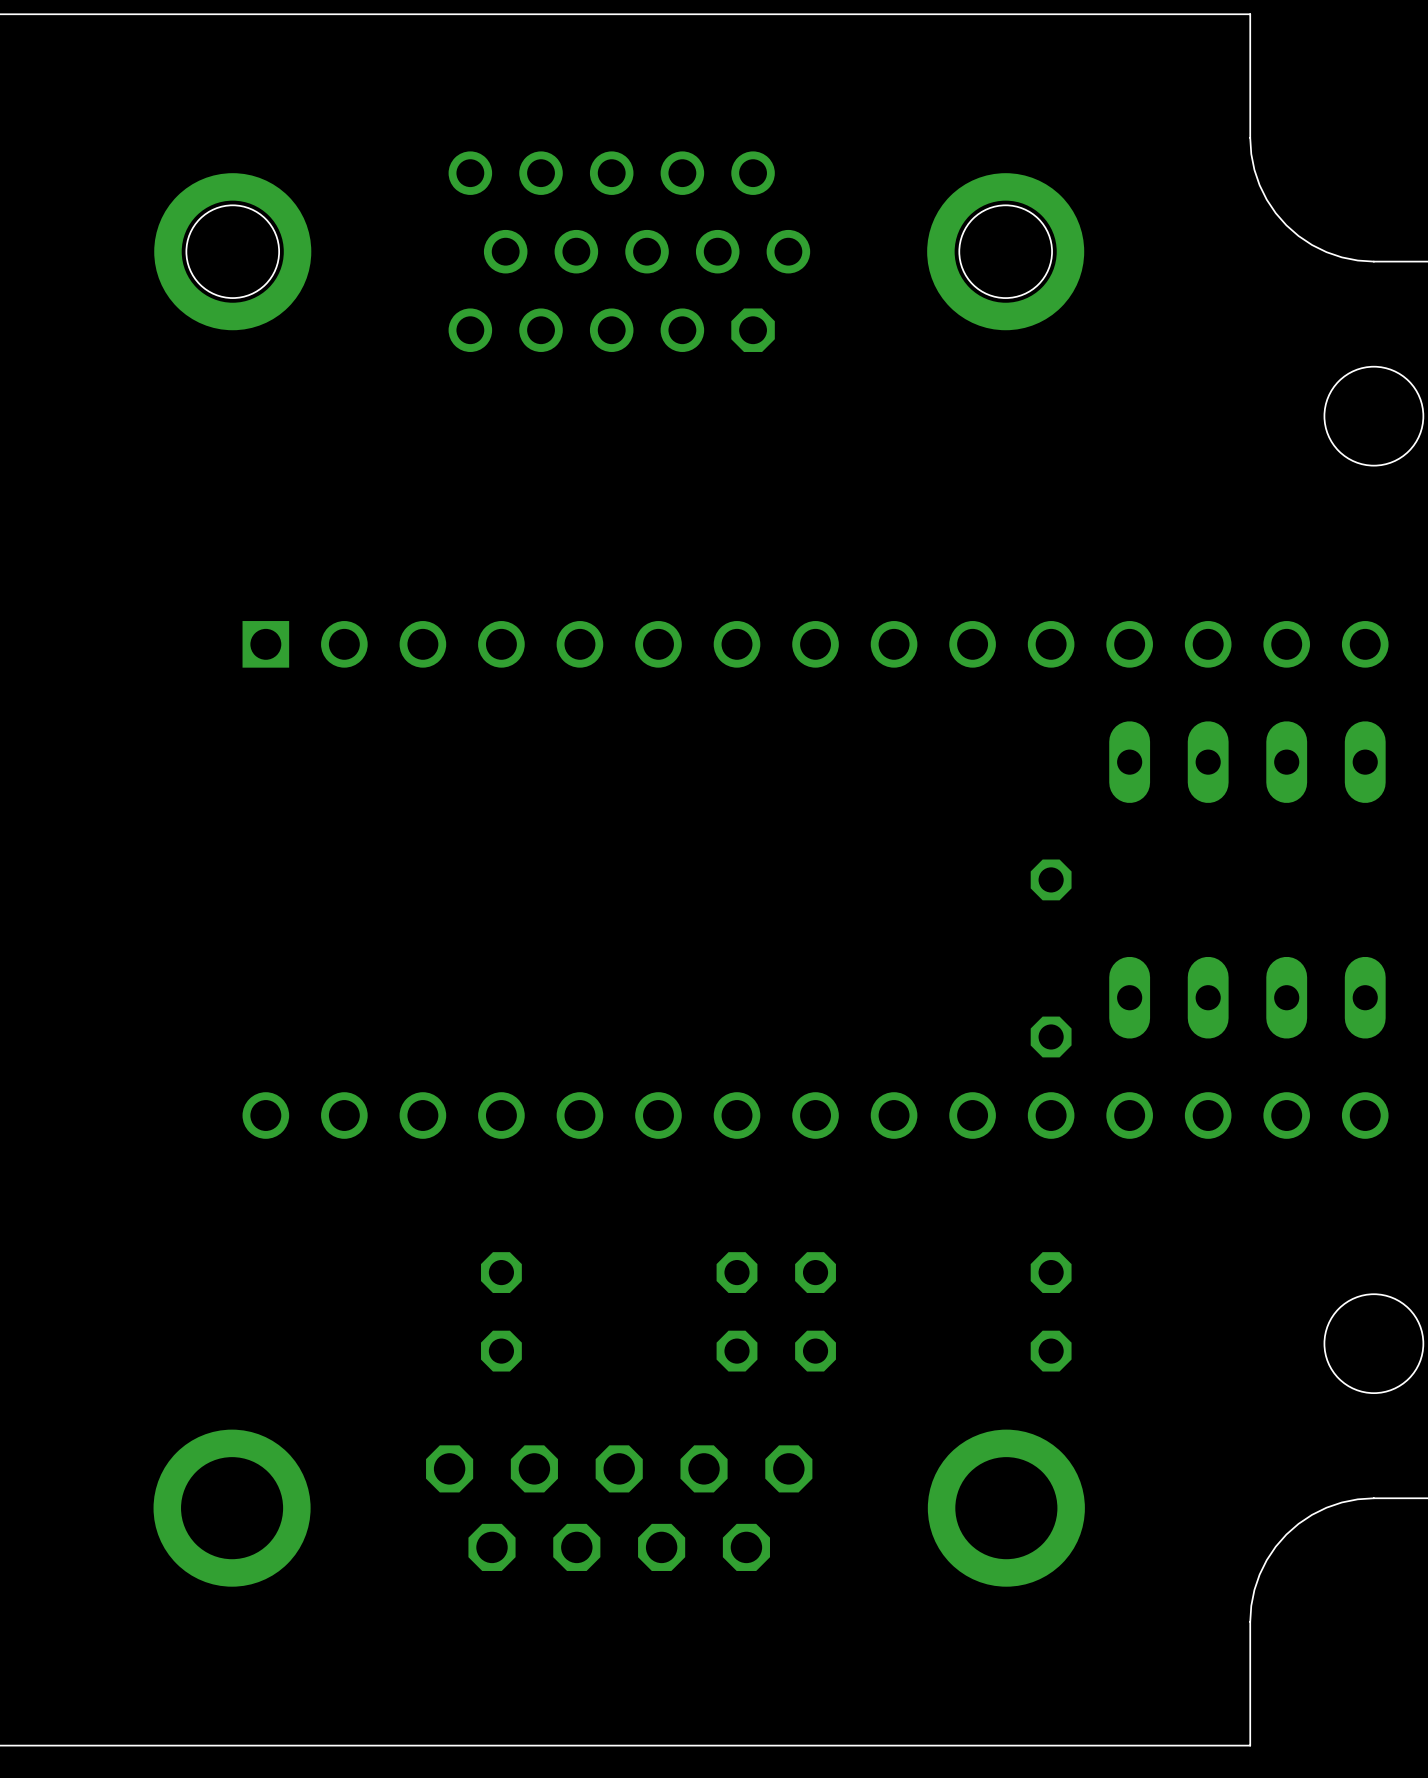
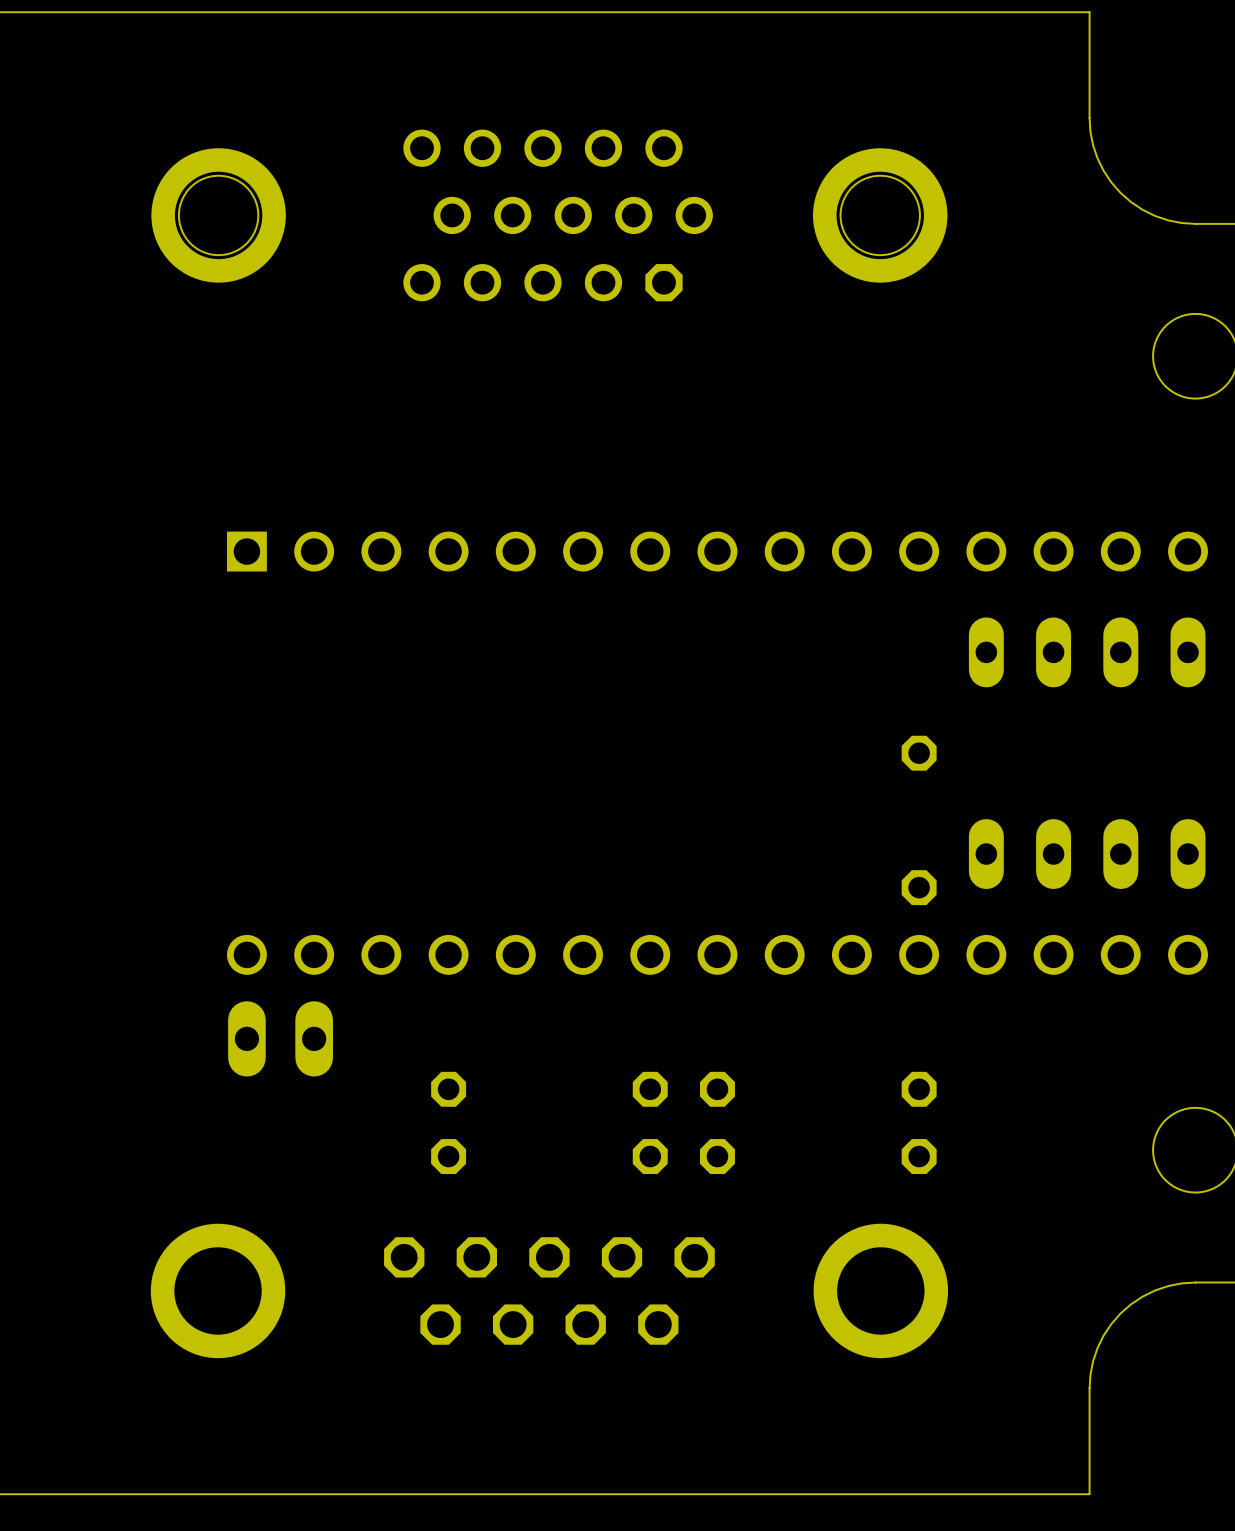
part: none -> (280, 1038)

